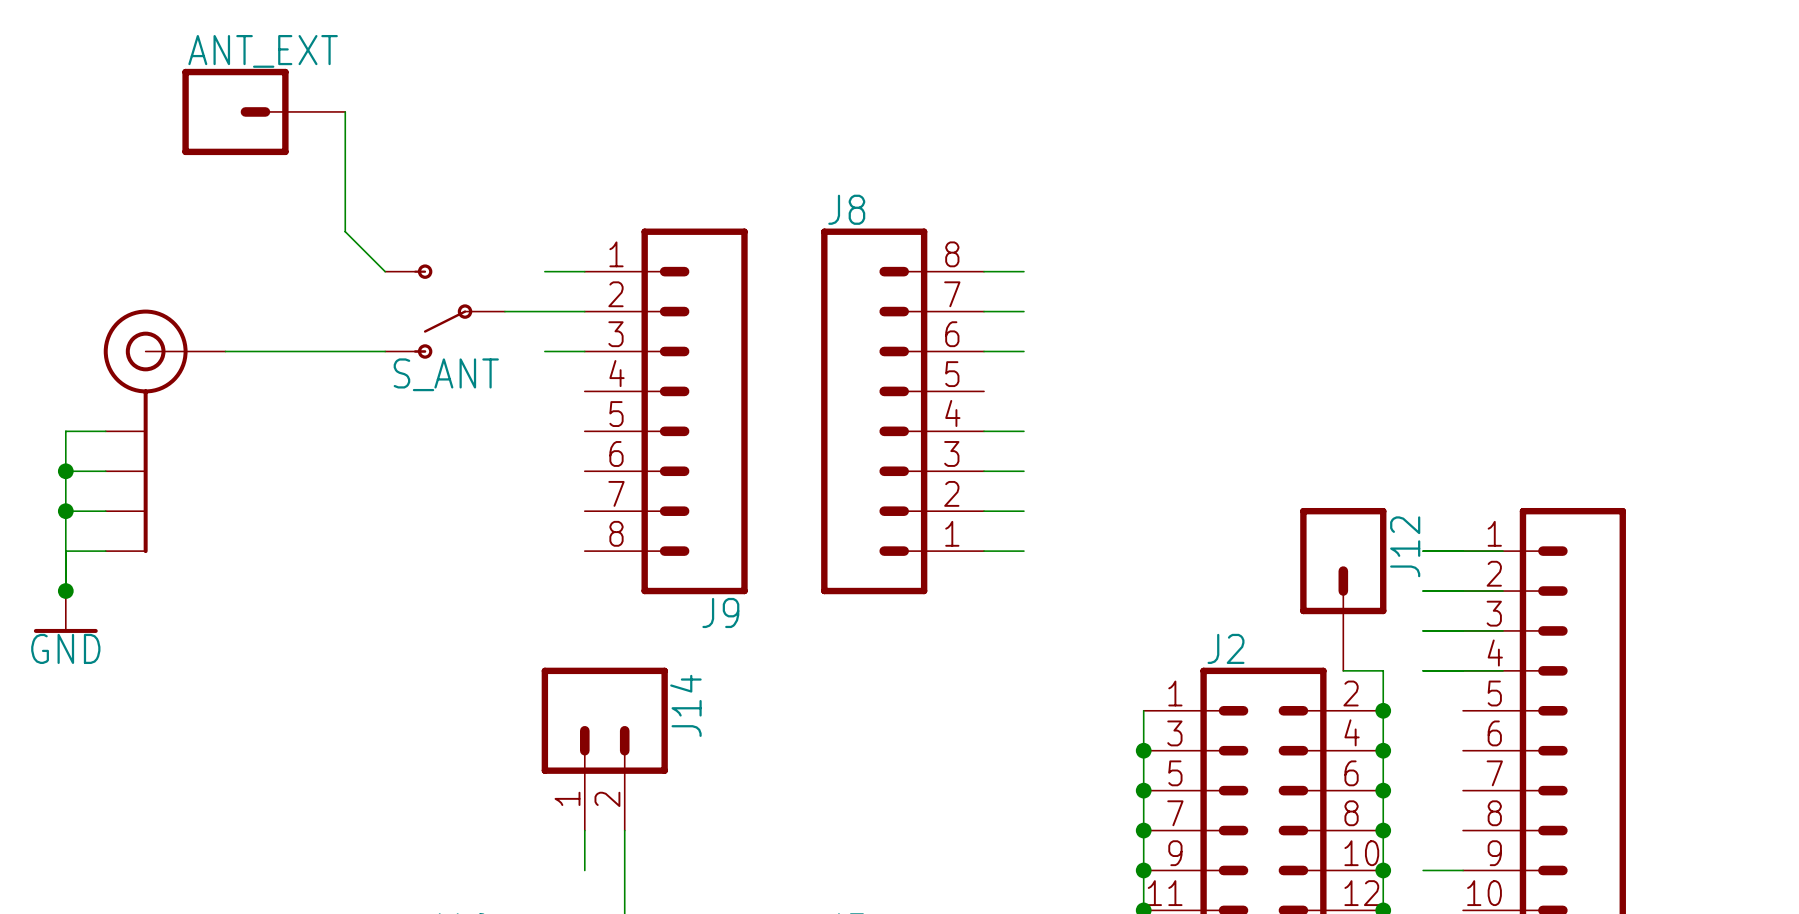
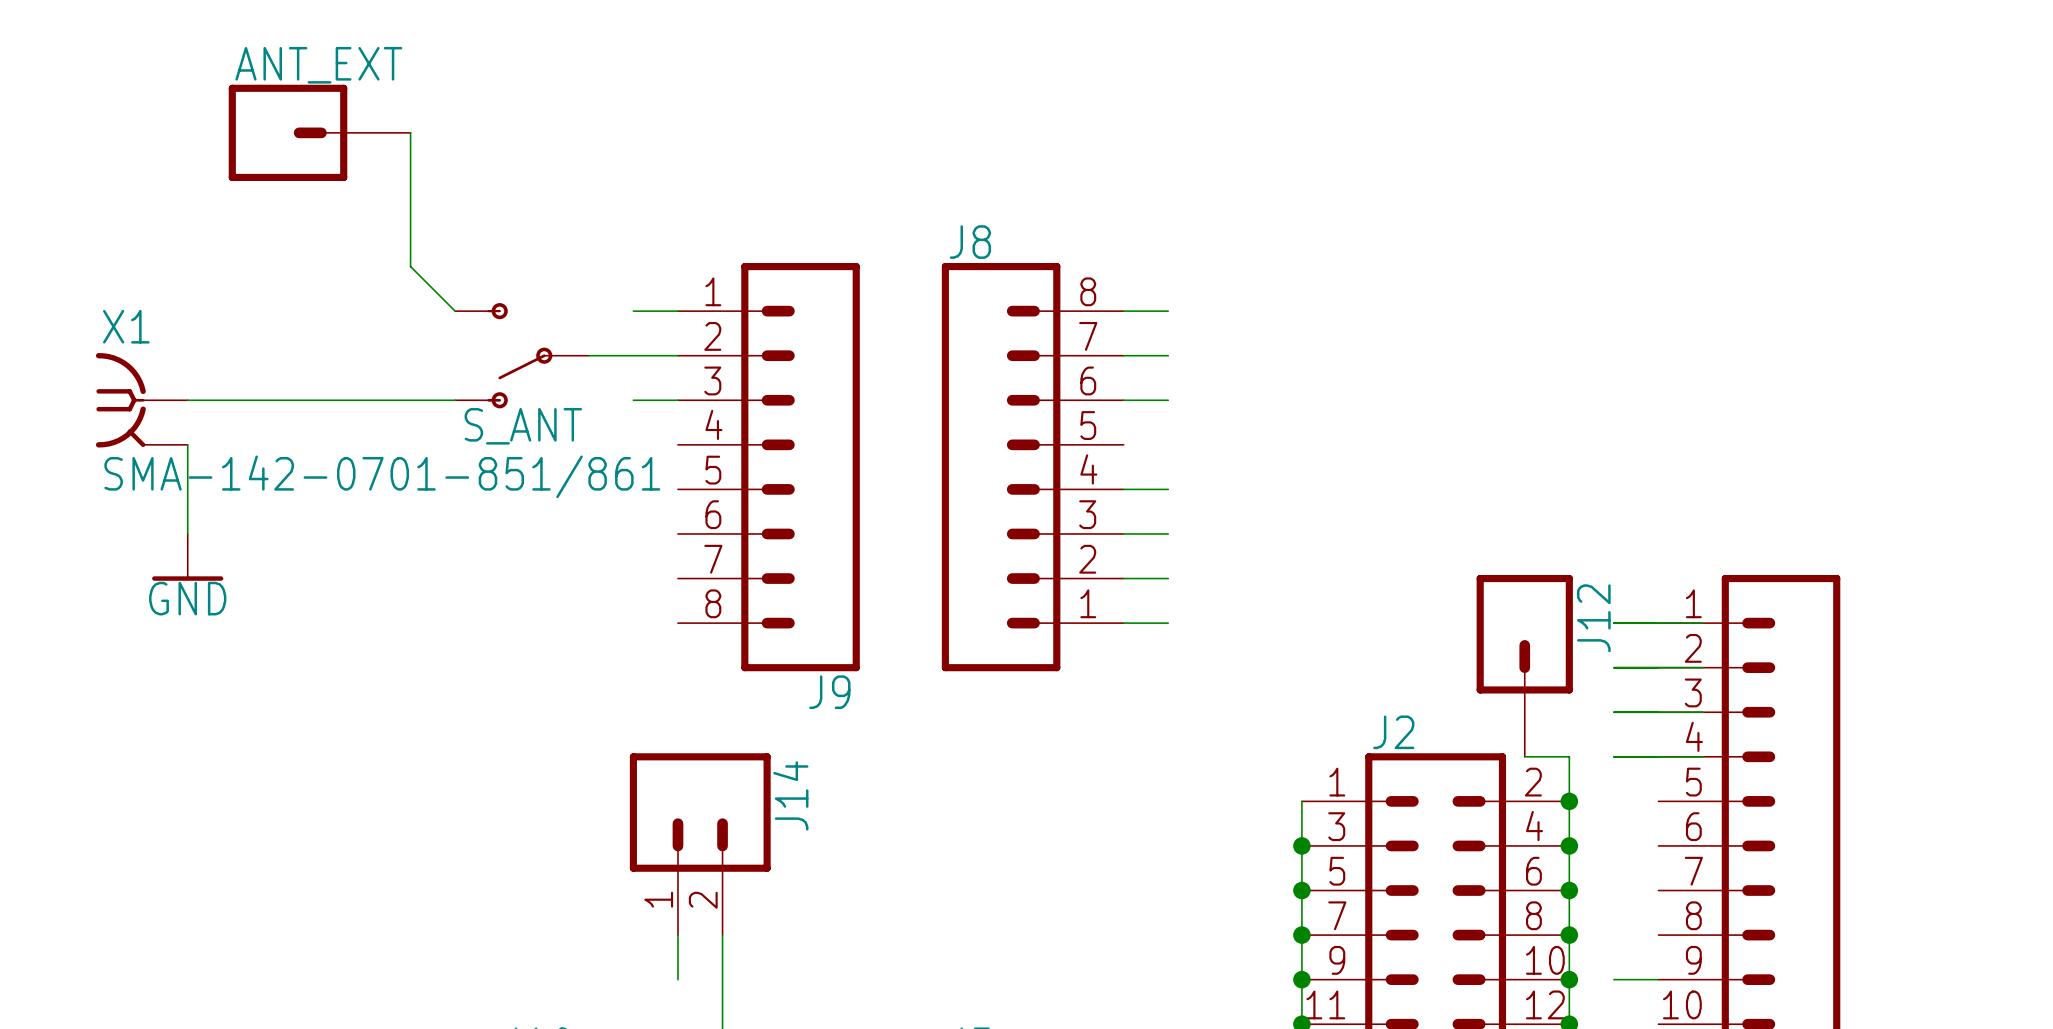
X1: none -> SMA-142-0701-851/861 (141, 400)
wire: (105, 431) (65, 431) (65, 591) -> none
part: (164, 431) -> none
wire: (65, 471) (105, 471) -> none
junction: (65, 471) -> none
wire: (65, 511) (105, 511) -> none
junction: (65, 511) -> none
wire: (65, 551) (105, 551) -> none
junction: (65, 591) -> none
power symbol position: GND (65, 611) -> GND (187, 557)

